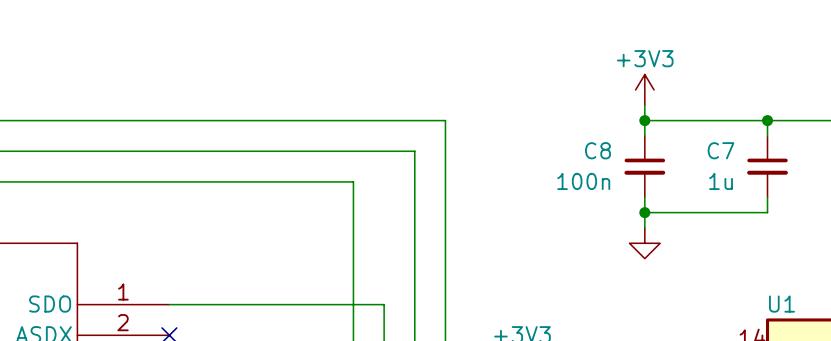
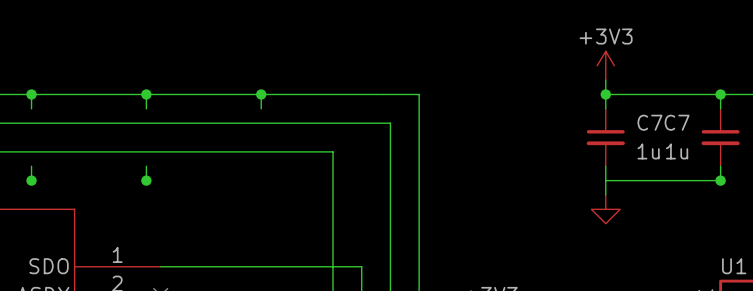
wire: none -> (31, 94) (31, 108)
junction: none -> (31, 94)
wire: none -> (146, 94) (146, 108)
junction: none -> (146, 94)
wire: none -> (261, 94) (261, 108)
junction: none -> (261, 94)
C8 name: C8 (597, 150) -> C7 (649, 122)
C8 value: 100n (583, 181) -> 1u (648, 151)
wire: none -> (31, 166) (31, 180)
wire: none -> (146, 166) (146, 180)
junction: none -> (31, 180)
junction: none -> (146, 180)
junction: (644, 212) -> none
junction: none -> (720, 180)

